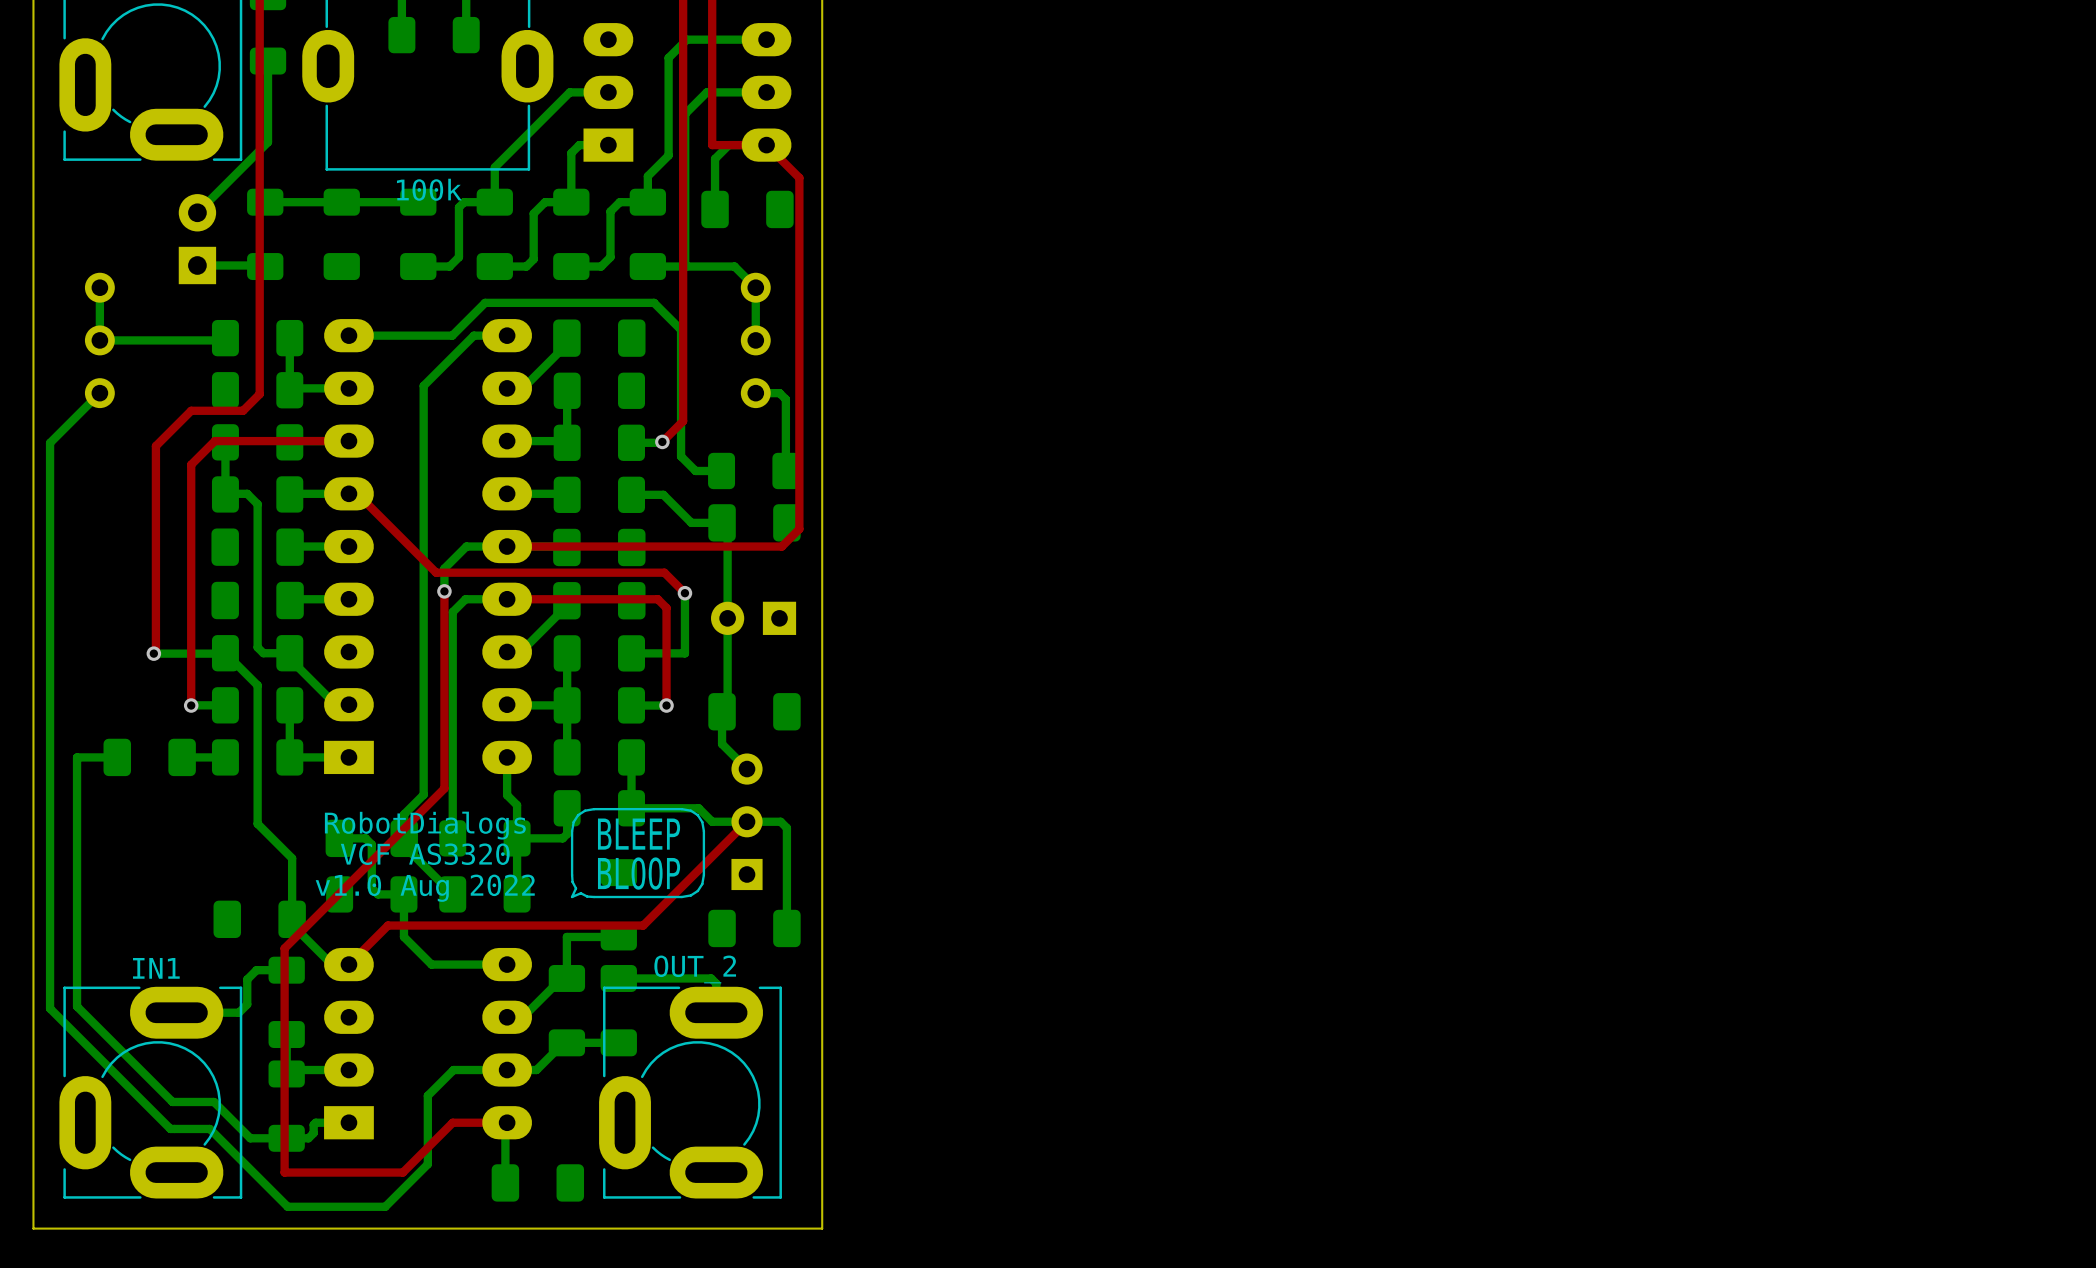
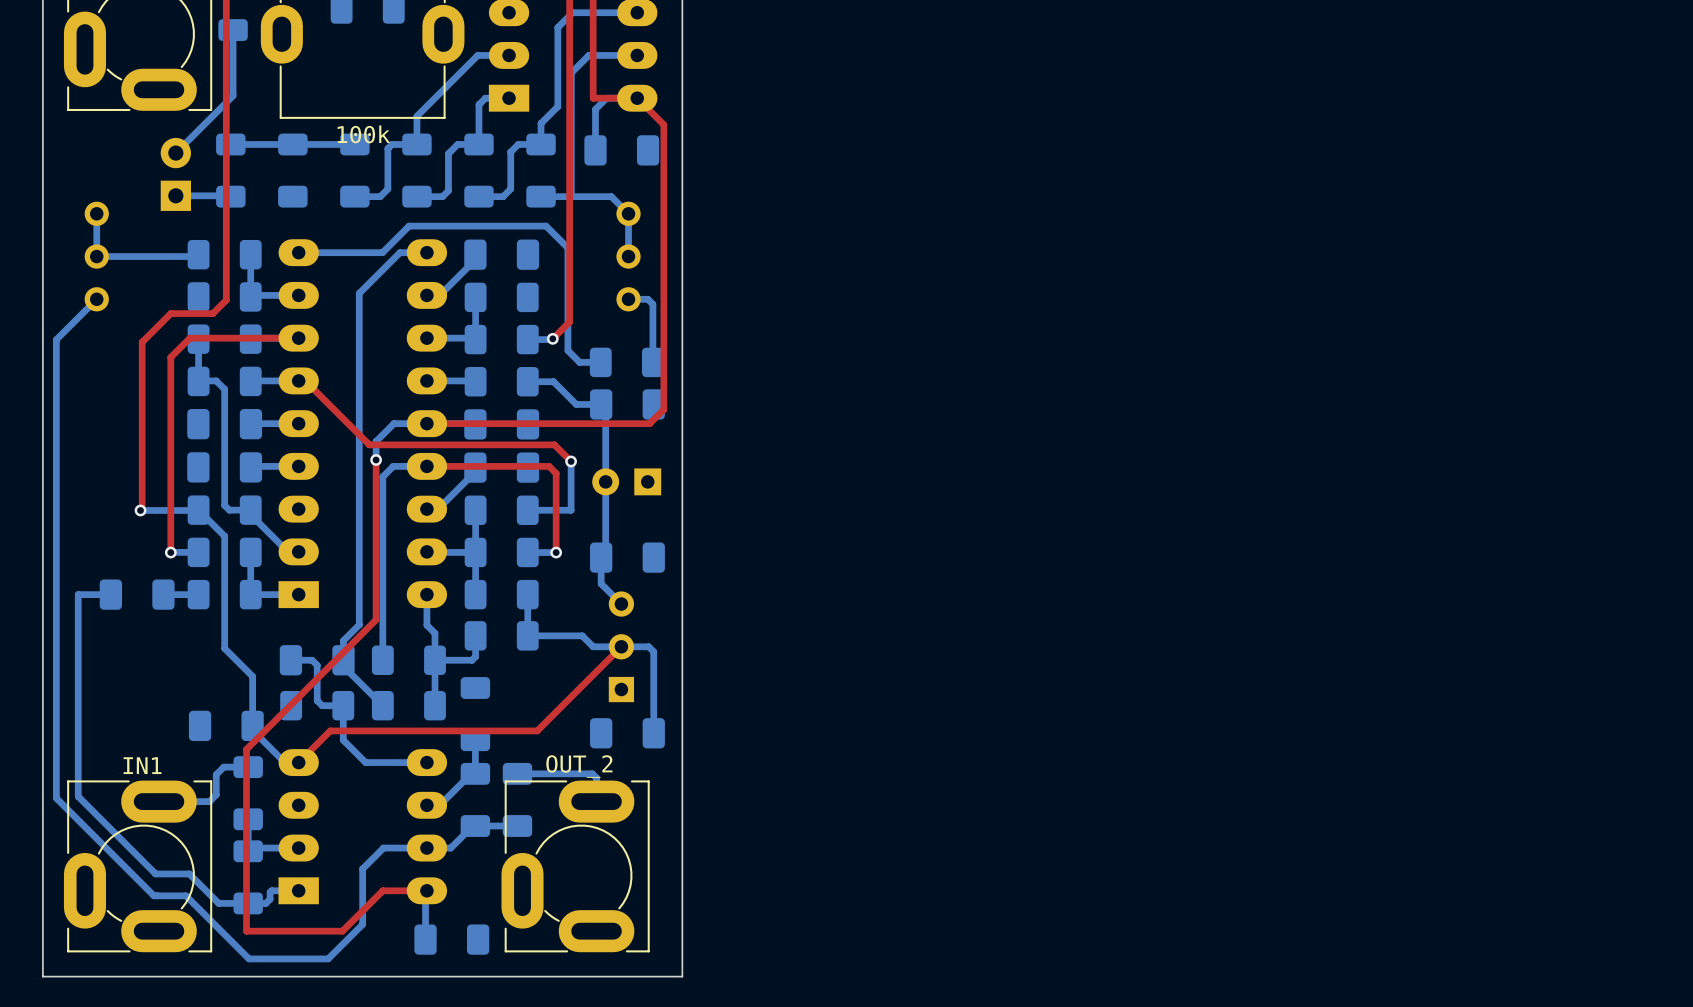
drawing: [570, 807, 706, 899] -> none
text: RobotDialogs (425, 825) -> none
text: VCF AS3320 (425, 854) -> none
text: v1.0 Aug 2022 (425, 888) -> none
part position: (618, 904) -> (475, 714)
bottom track: (566, 936) (618, 936) -> none

